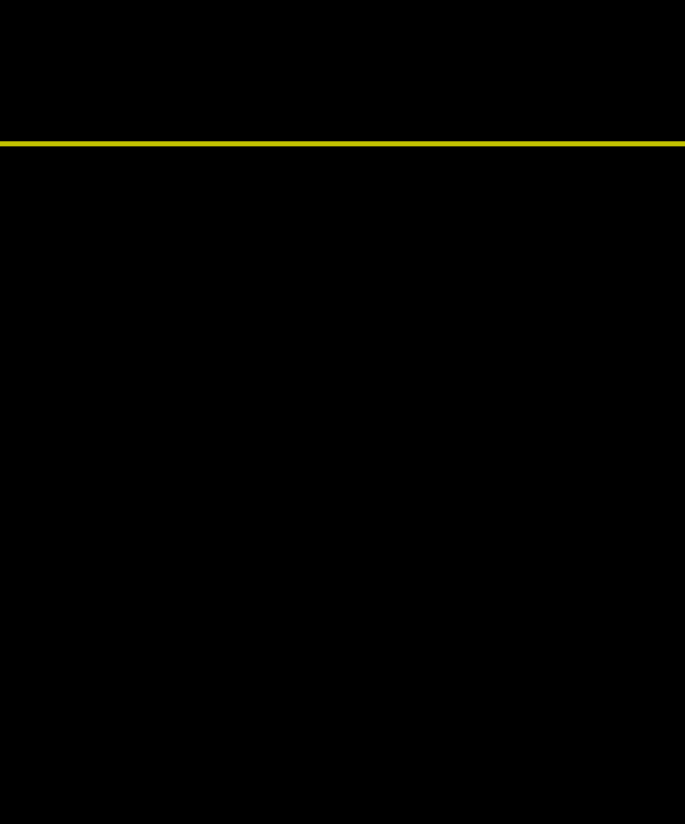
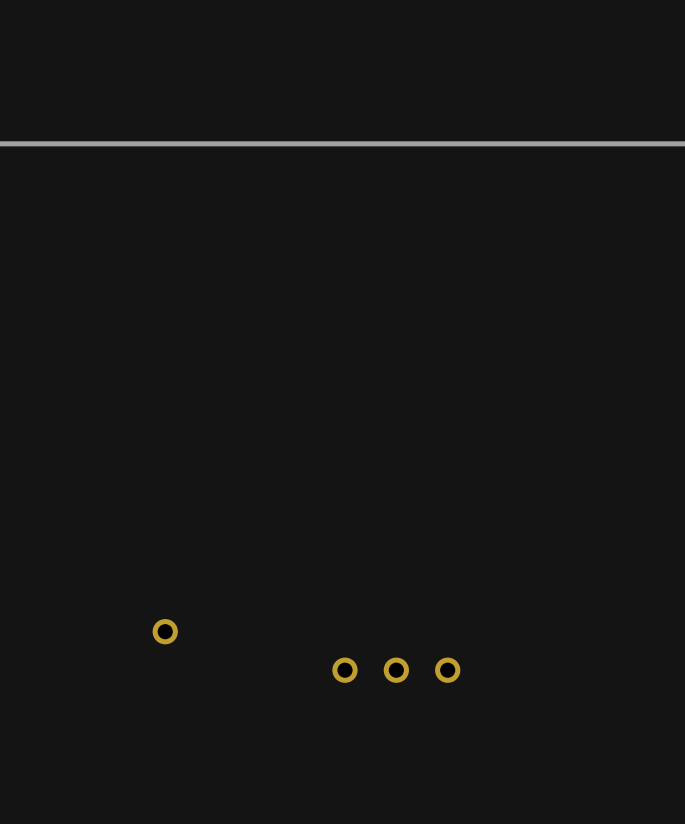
via: none -> (165, 631)
via: none -> (344, 670)
via: none -> (396, 670)
via: none -> (447, 670)

